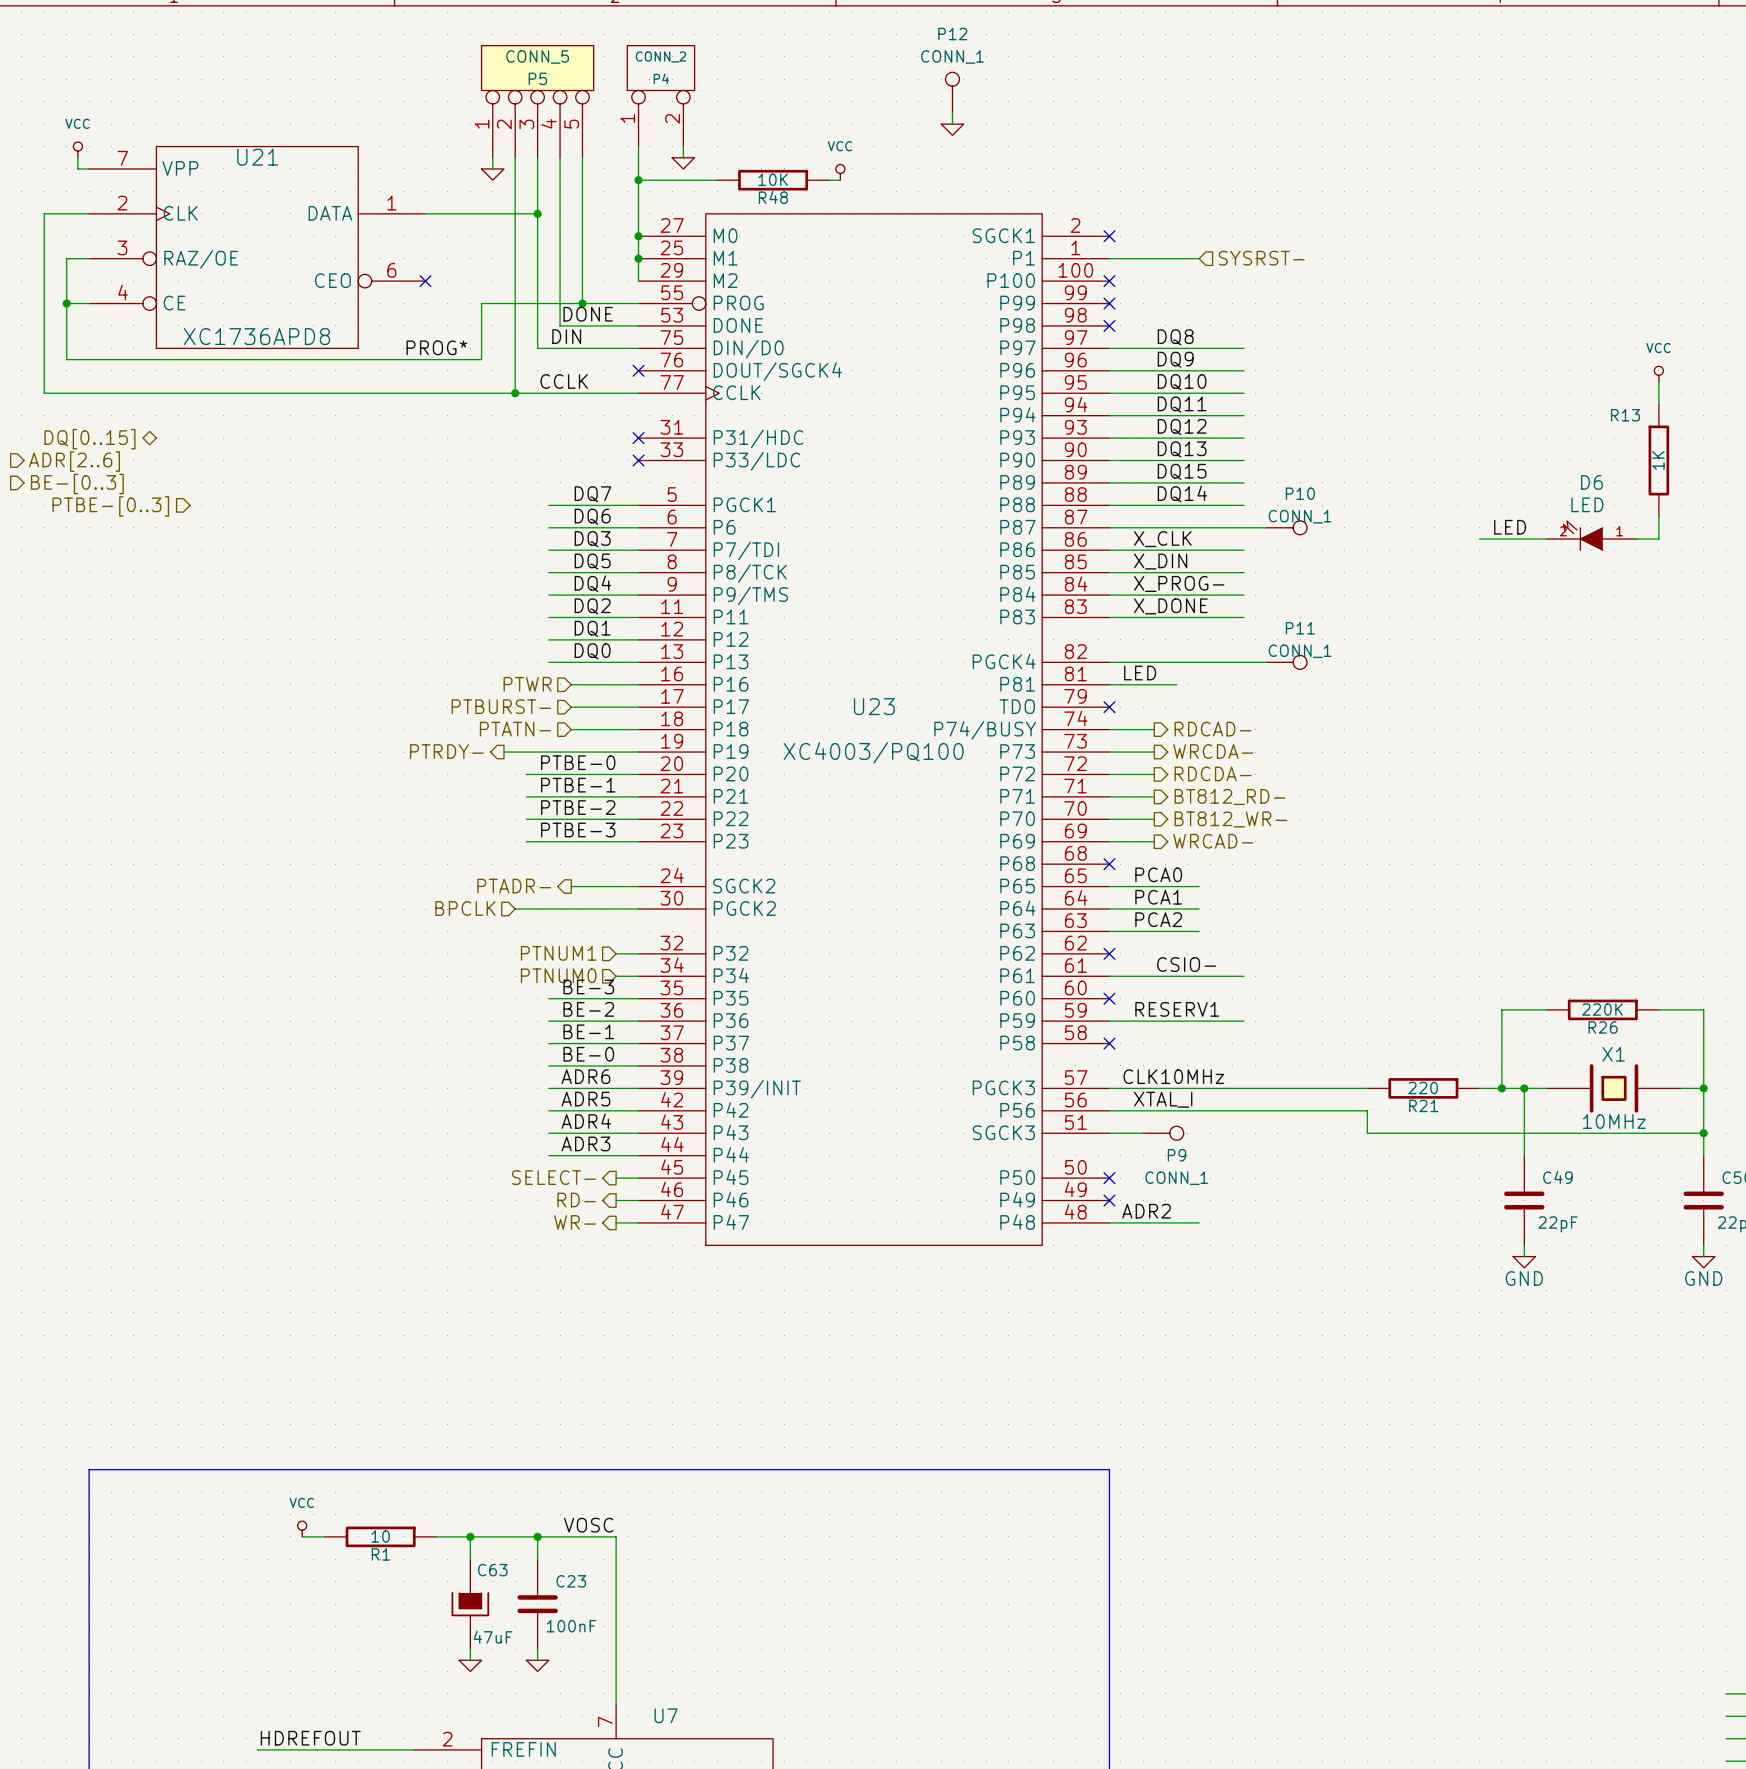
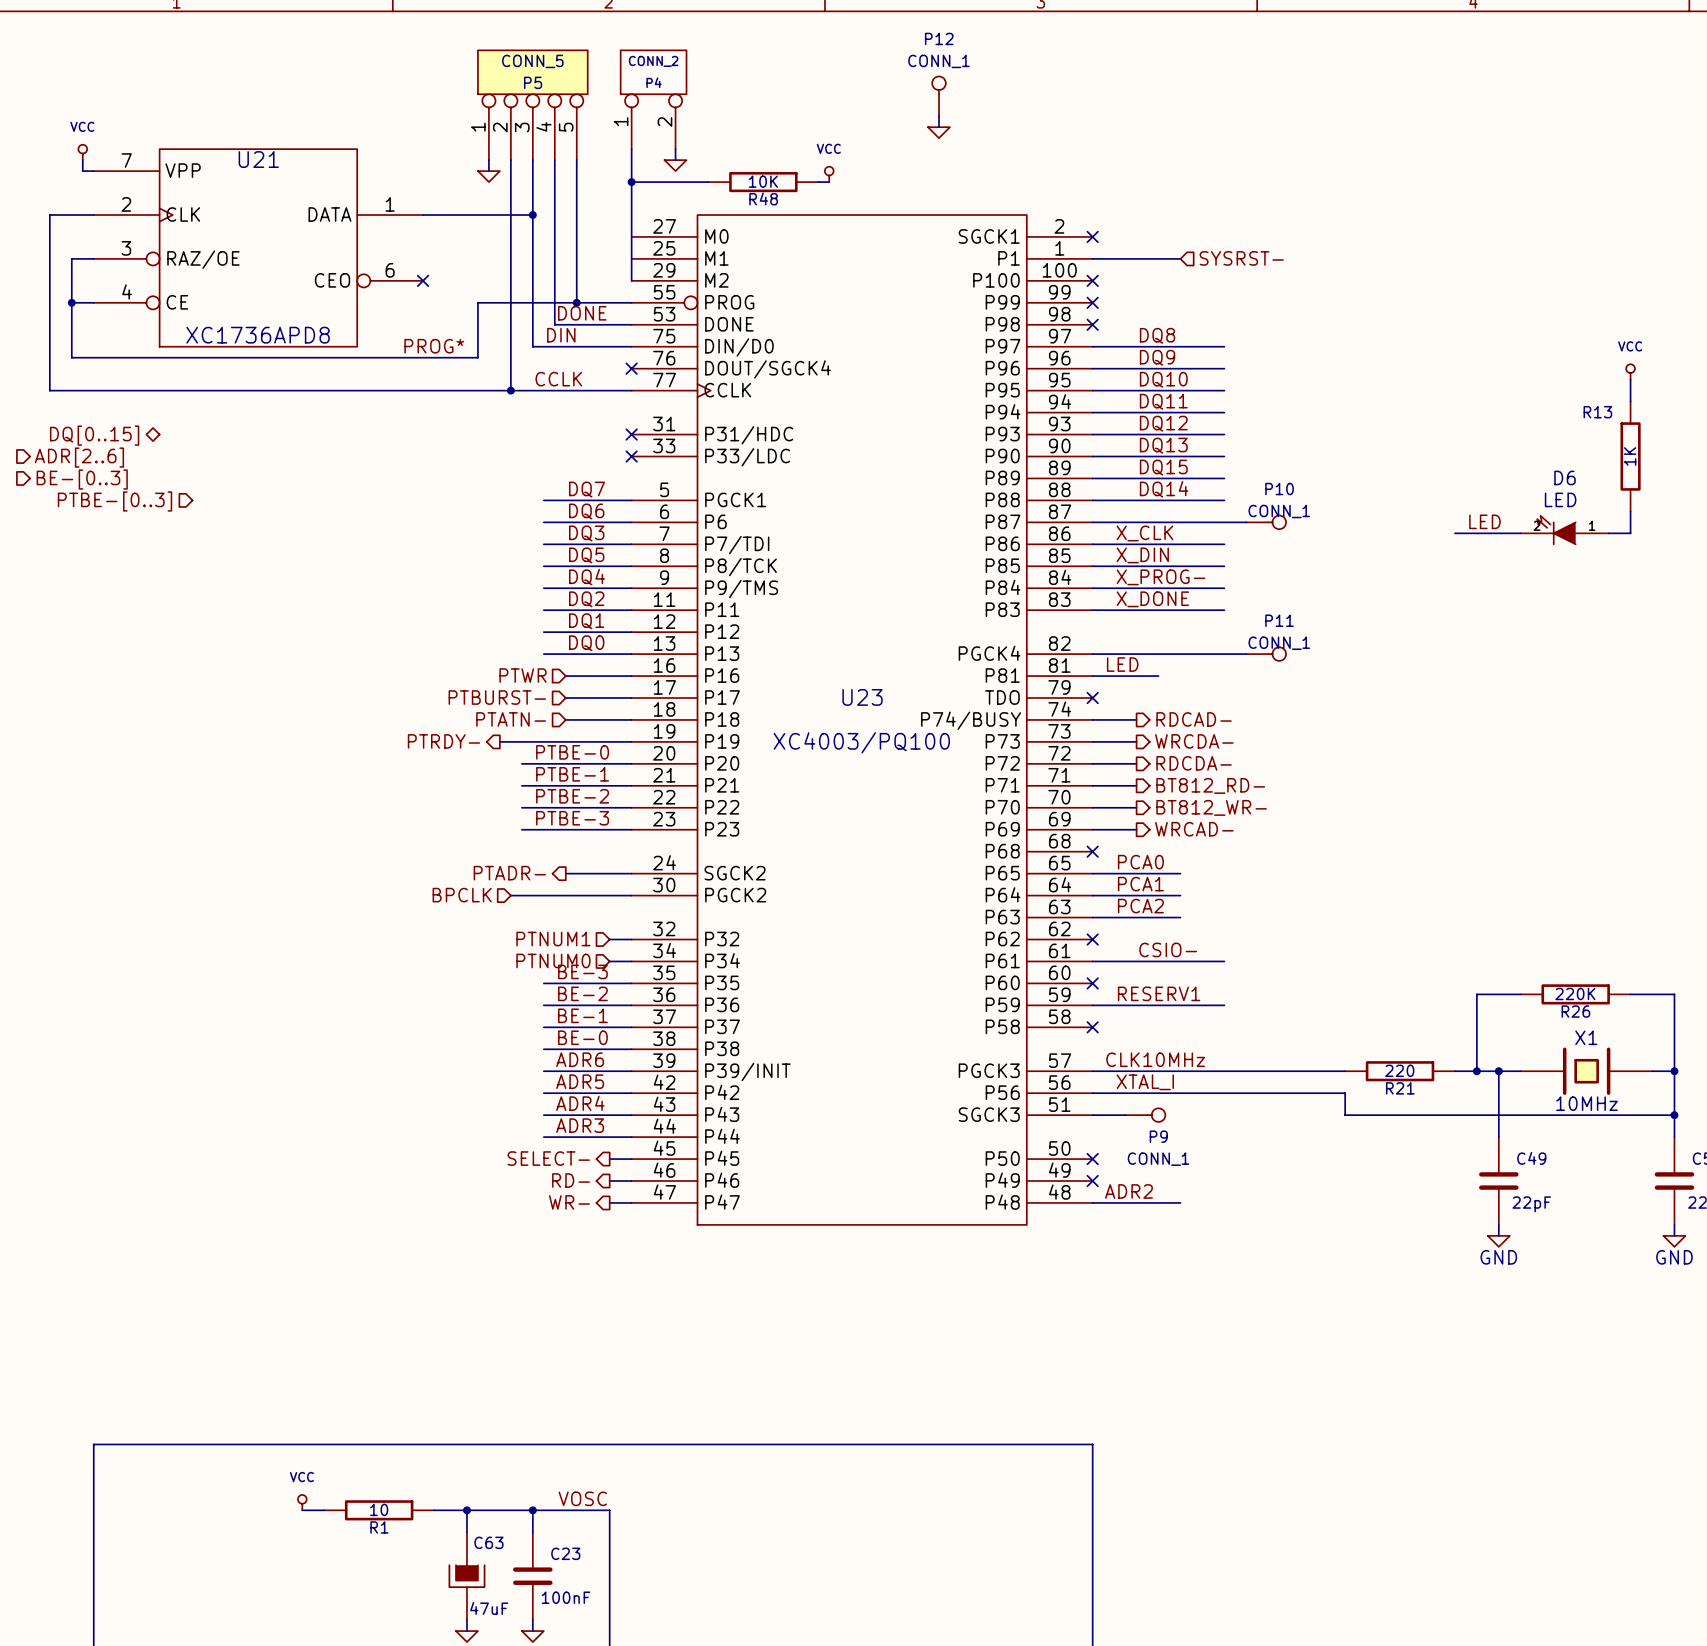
junction: (638, 236) -> none
junction: (638, 258) -> none

